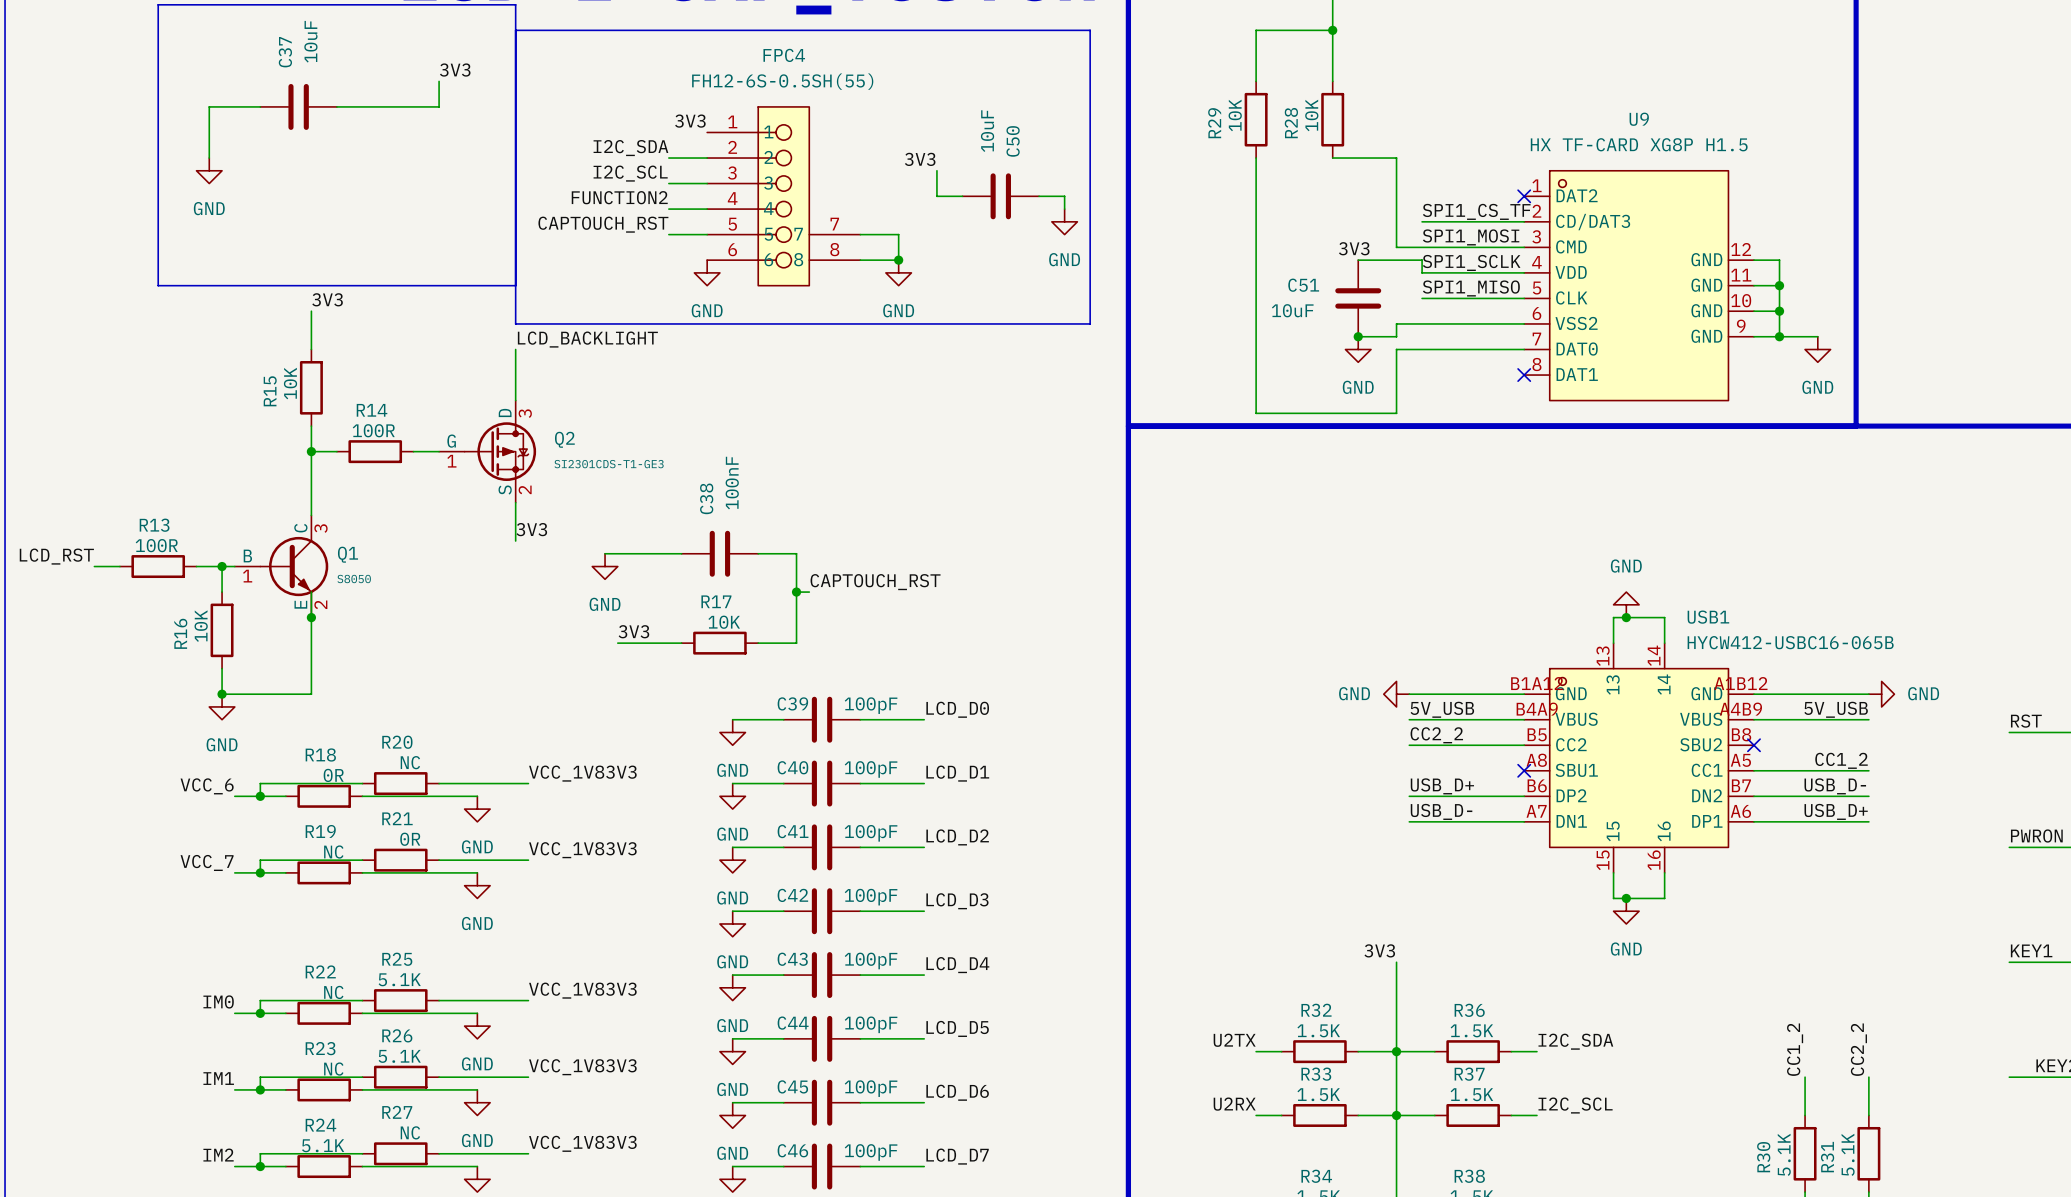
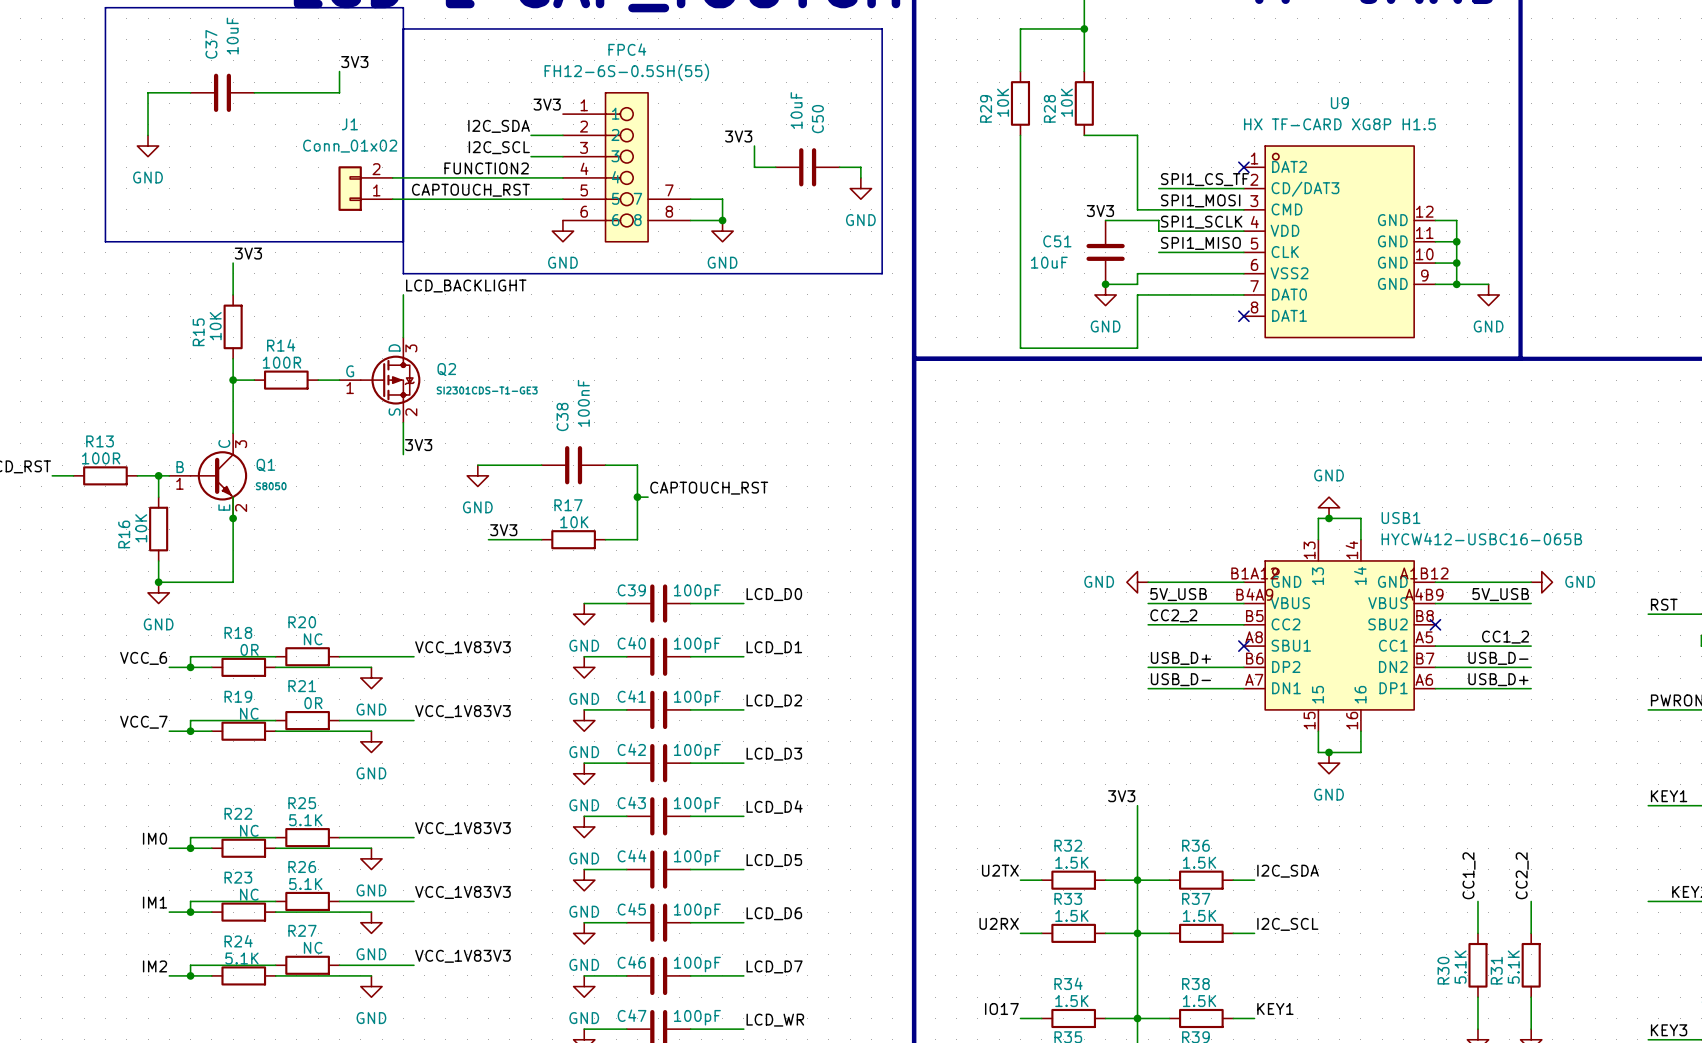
wire: none -> (392, 177) (531, 177)
J1: none -> Conn_01x02 (365, 188)
wire: none -> (392, 199) (531, 199)

